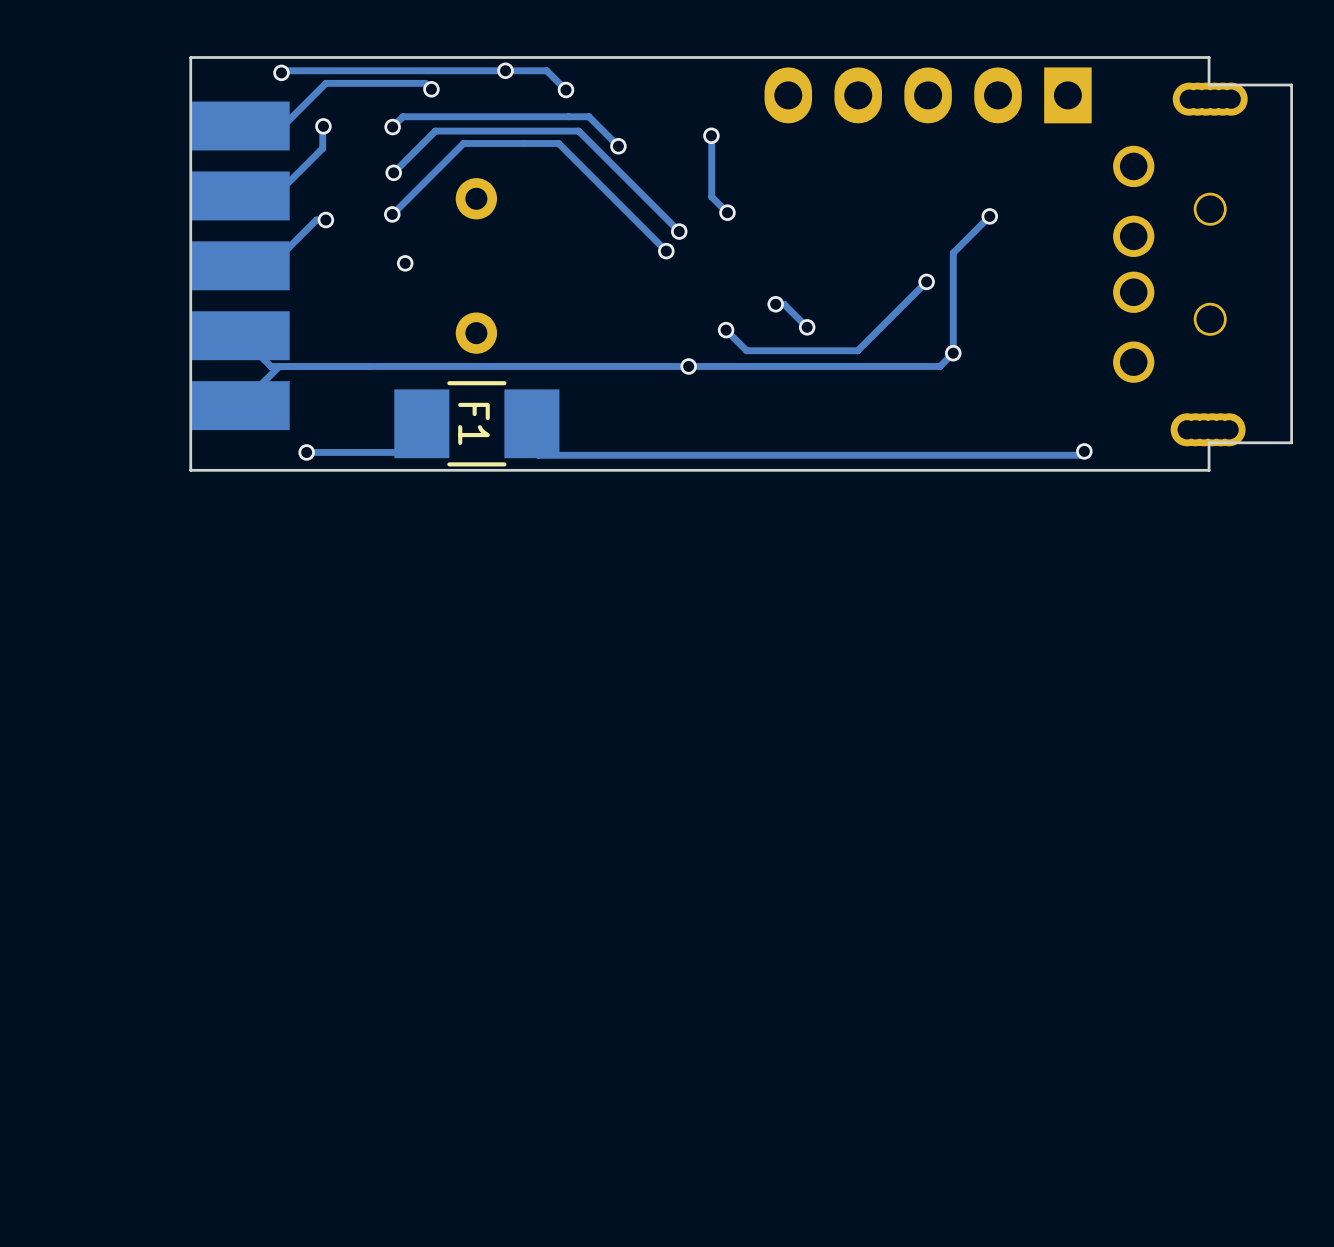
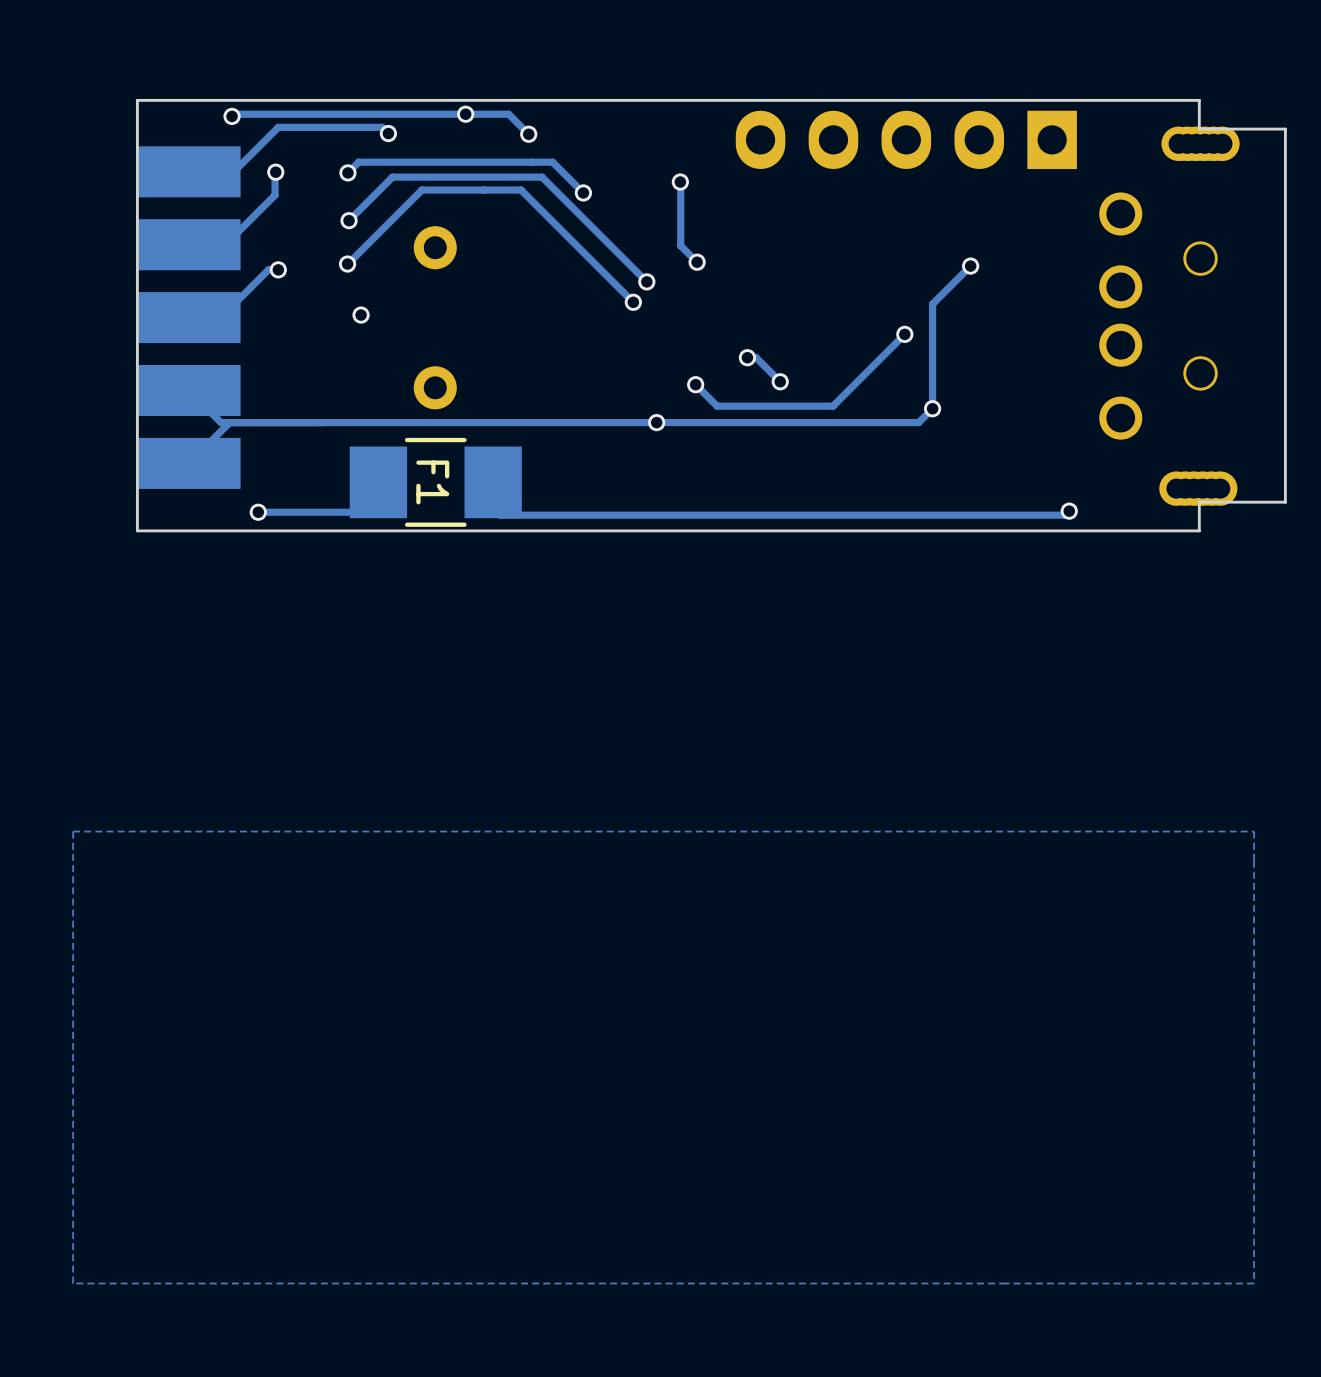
zone outline: none -> (1254, 831) (1254, 1283) (73, 1283) (73, 831) (1254, 831)

